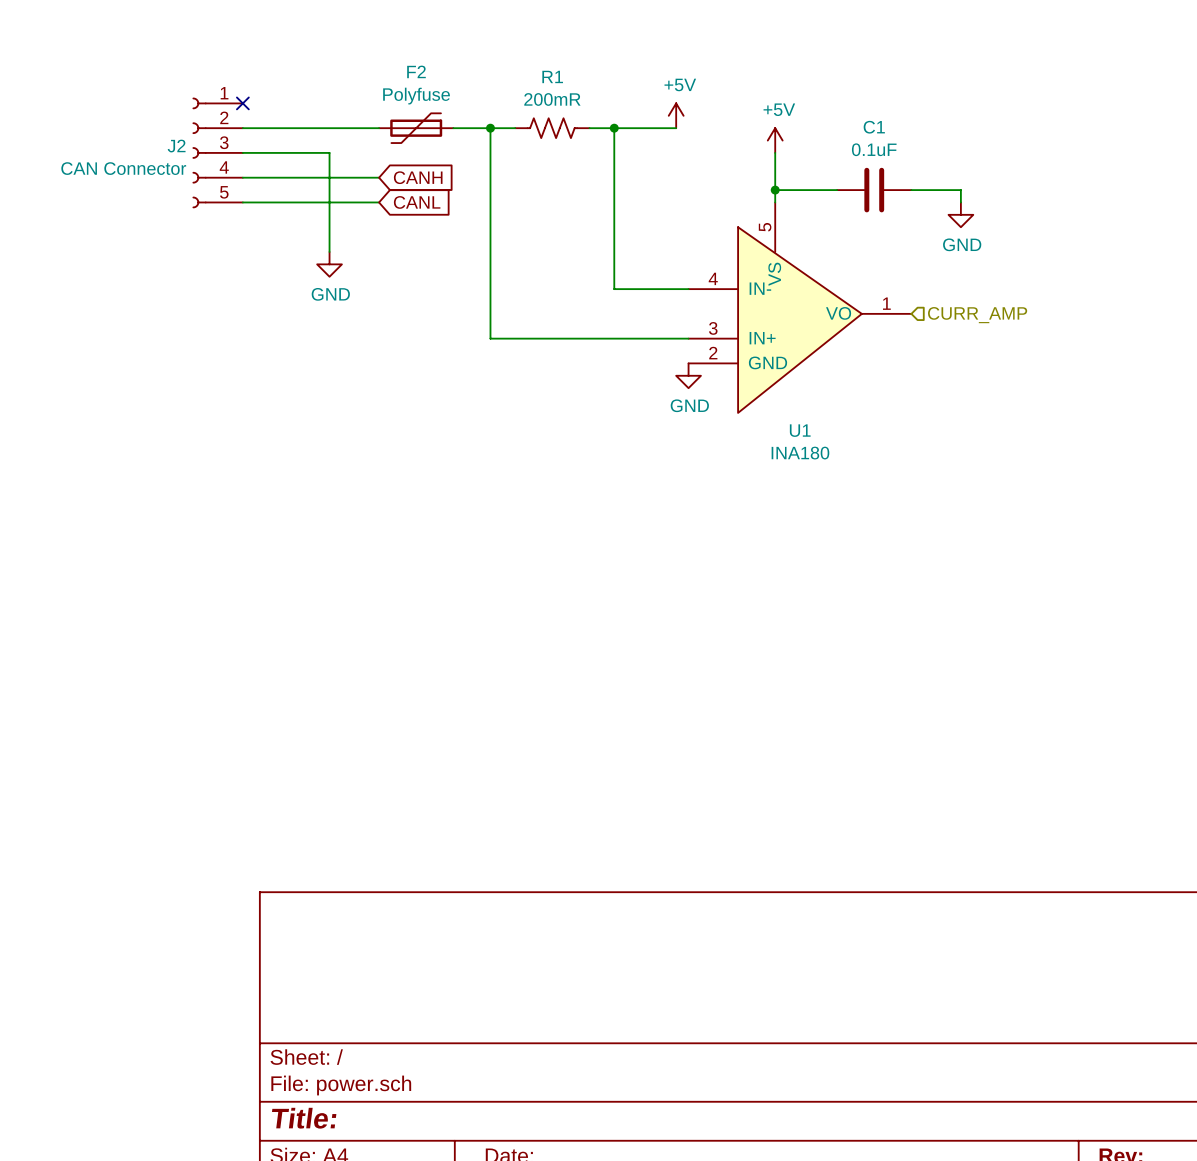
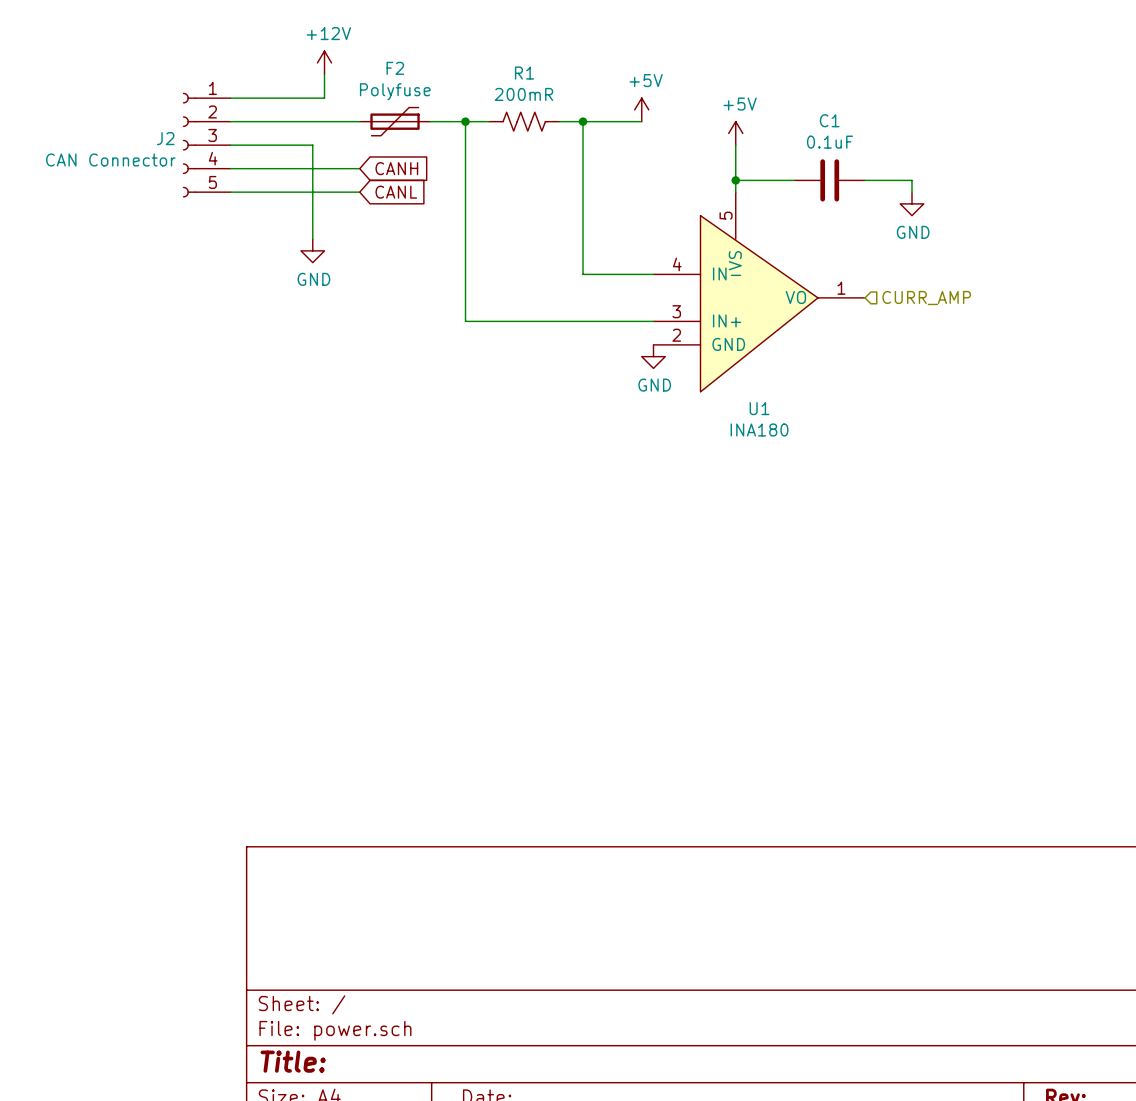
power symbol: none -> +12V (324, 62)
wire: none -> (324, 74) (324, 98) (230, 98)
no-connect mark: (242, 103) -> none

